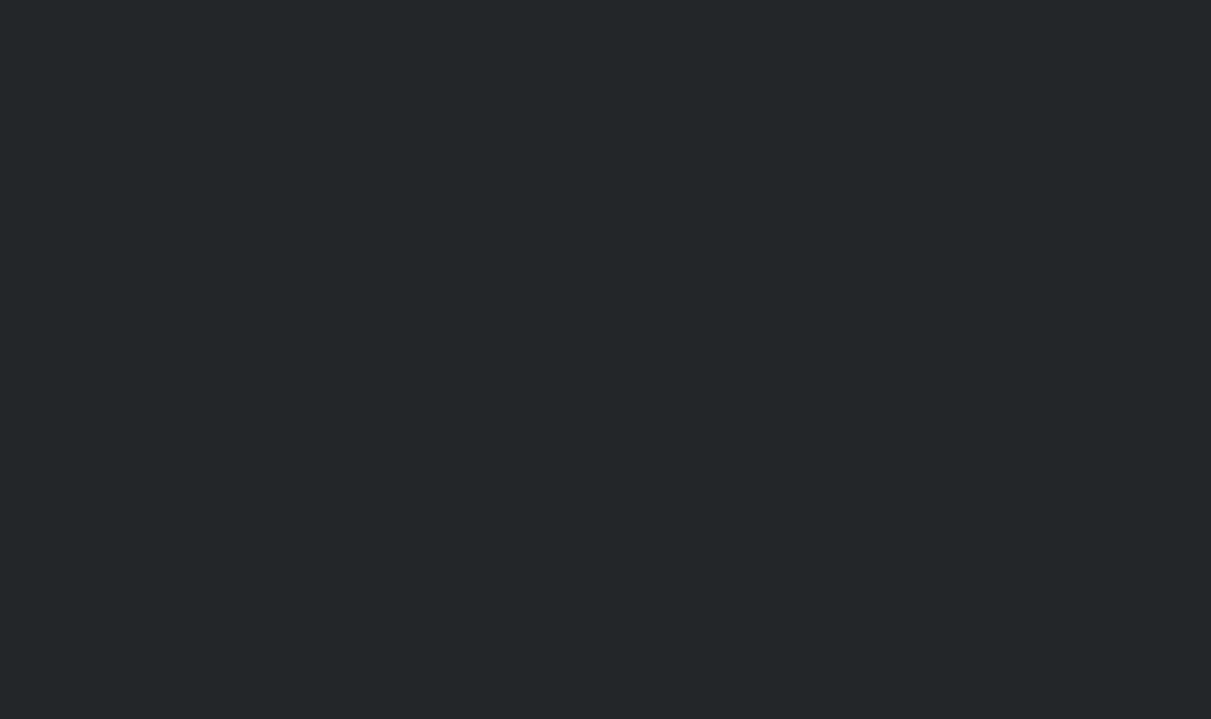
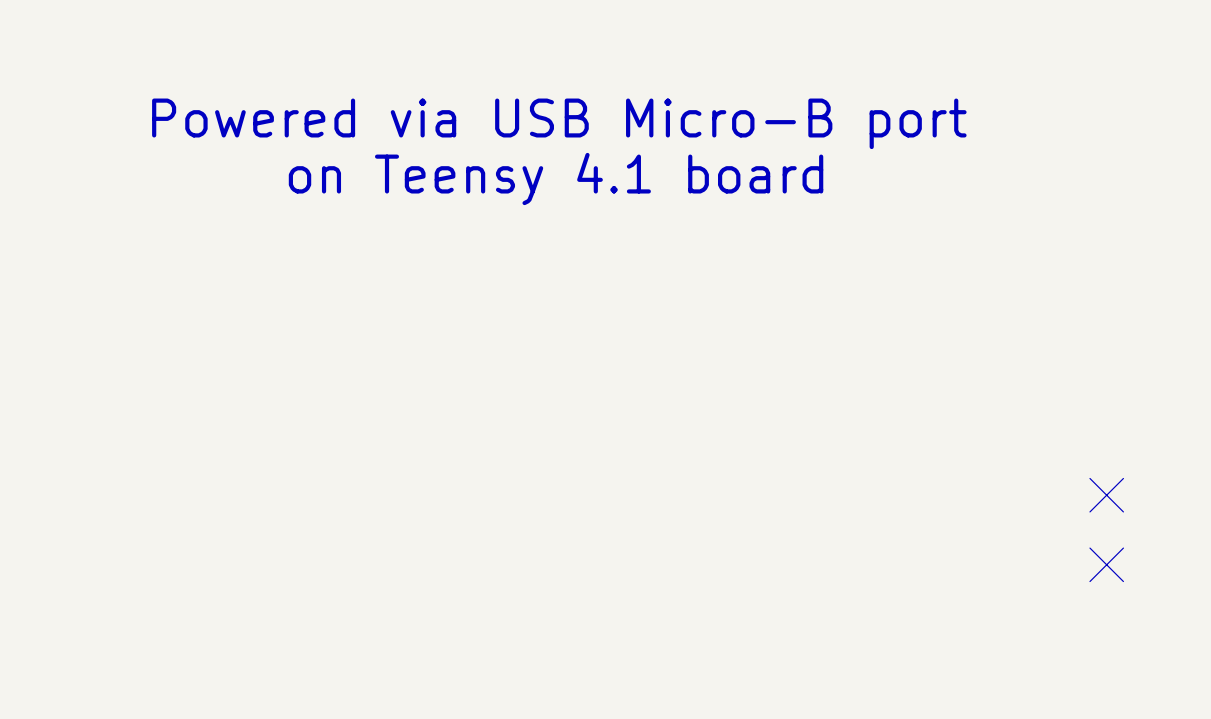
text: none -> Powered via USB Micro-B port (559, 123)
text: none -> on Teensy 4.1 board (556, 179)
no-connect mark: none -> (1106, 495)
no-connect mark: none -> (1106, 564)

